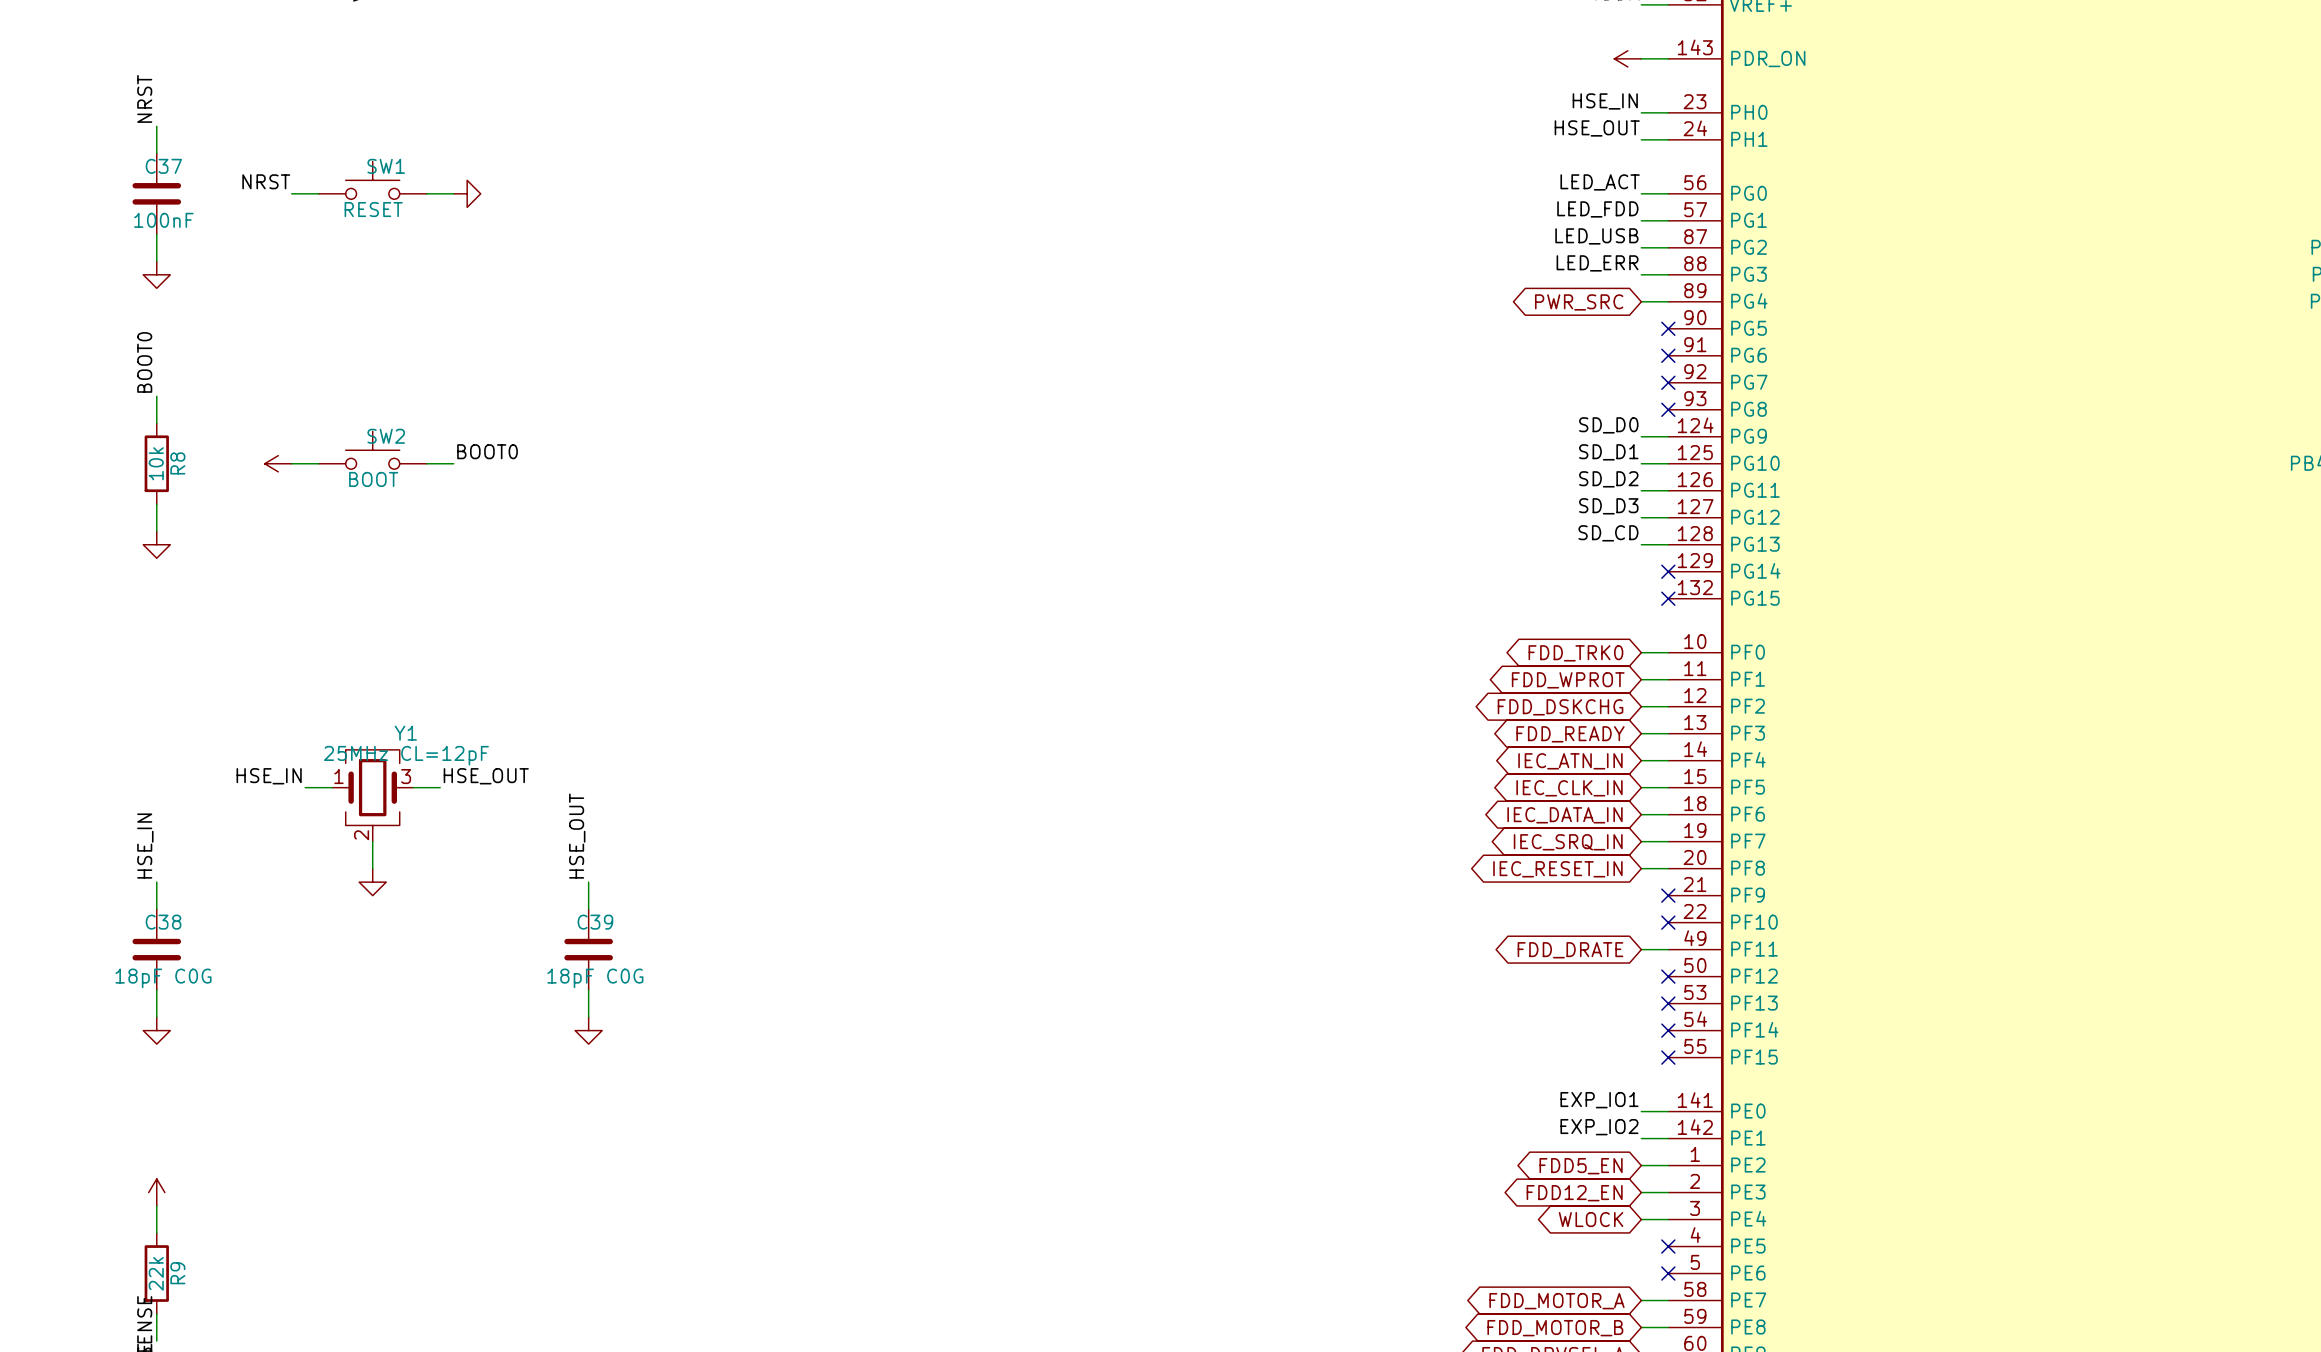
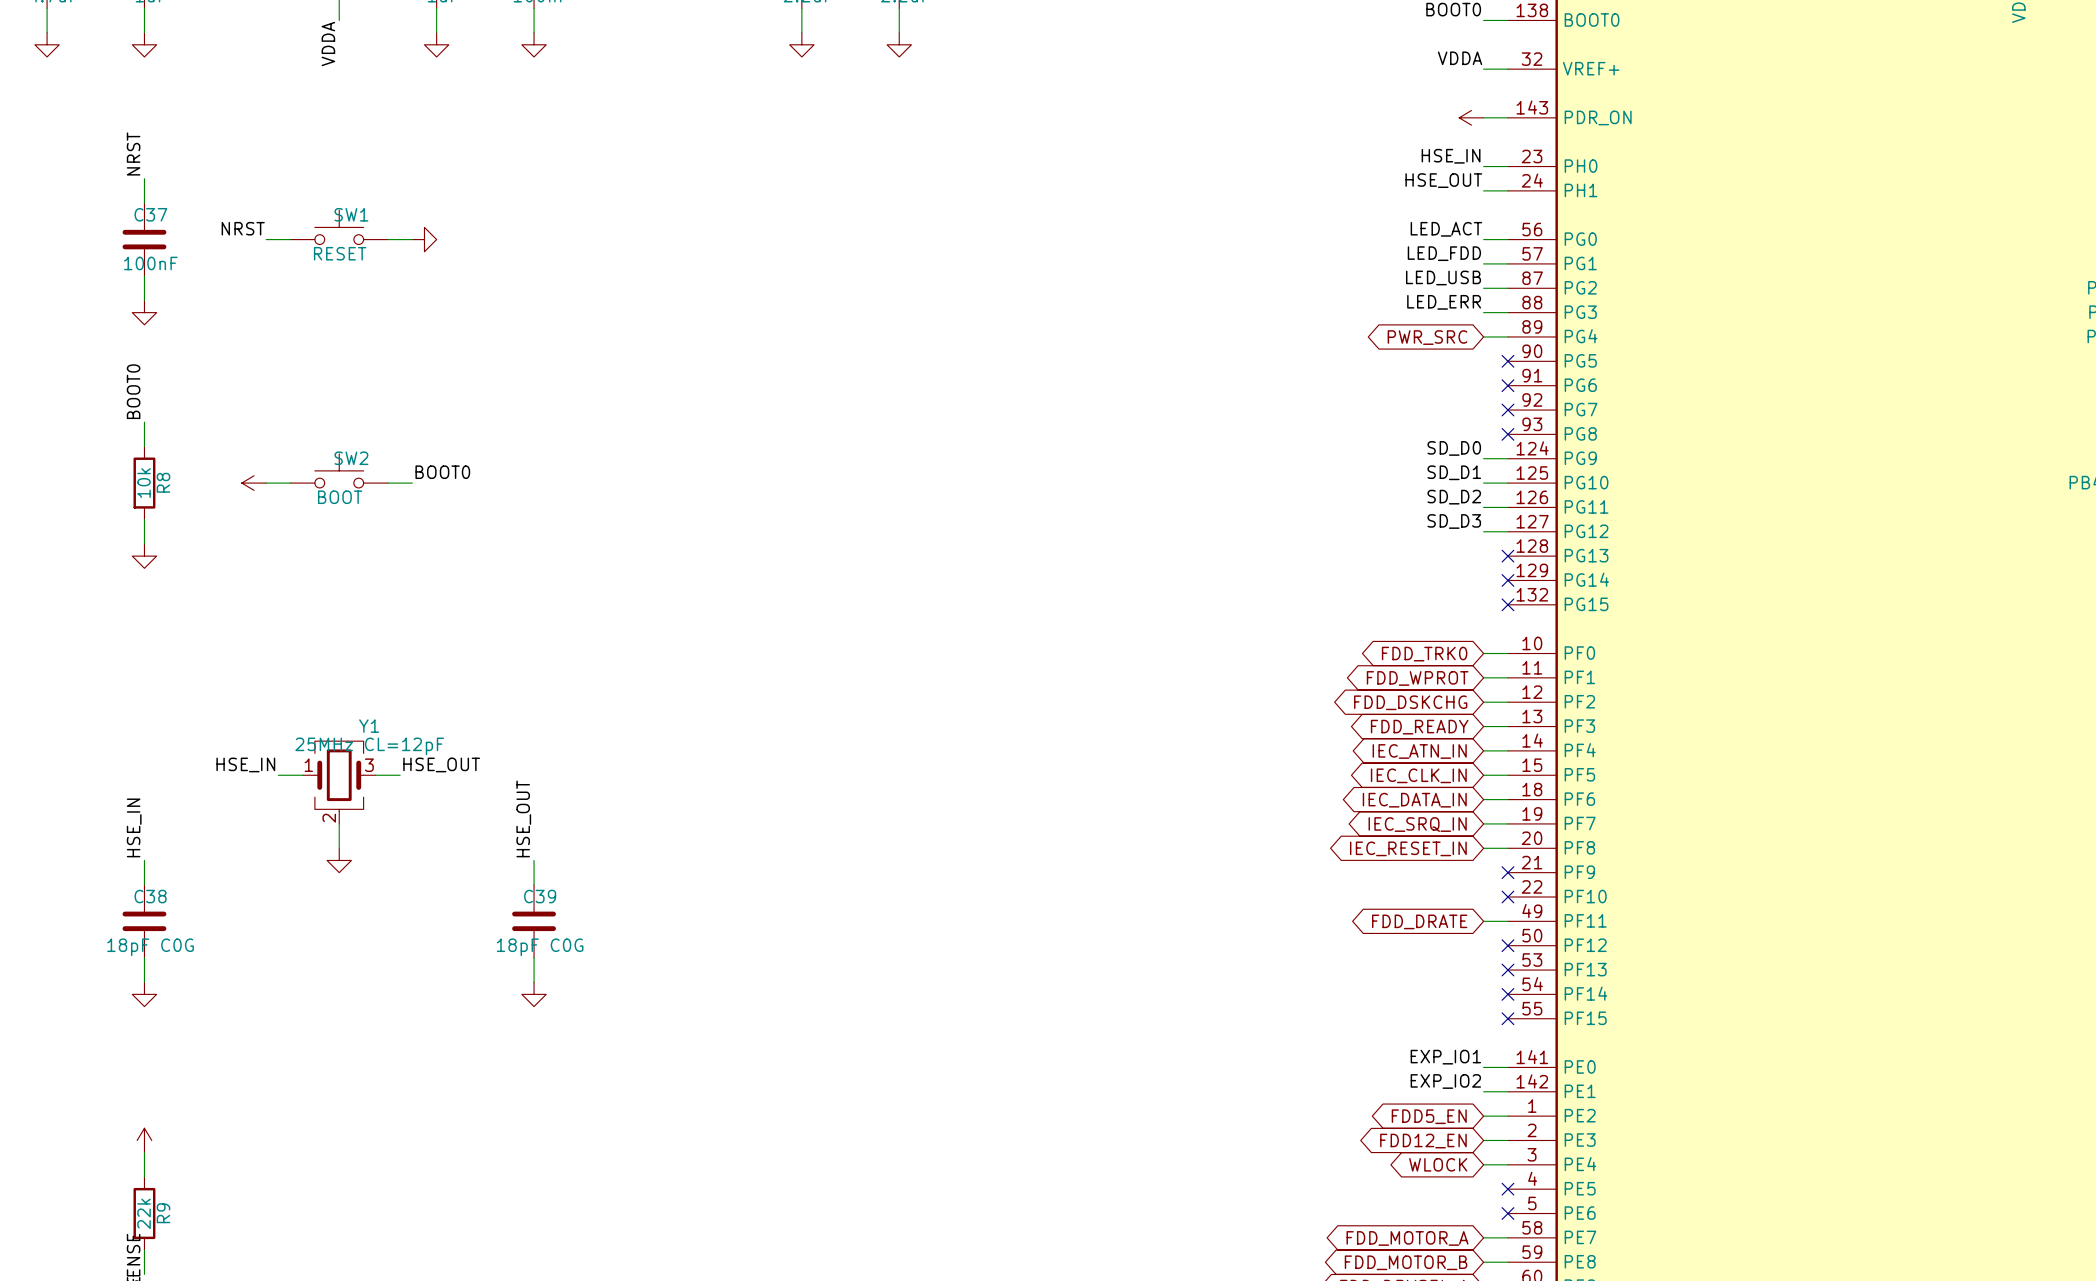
label: SD_CD (1608, 533) -> none
wire: (1641, 544) (1668, 544) -> none
no-connect mark: none -> (1507, 556)

